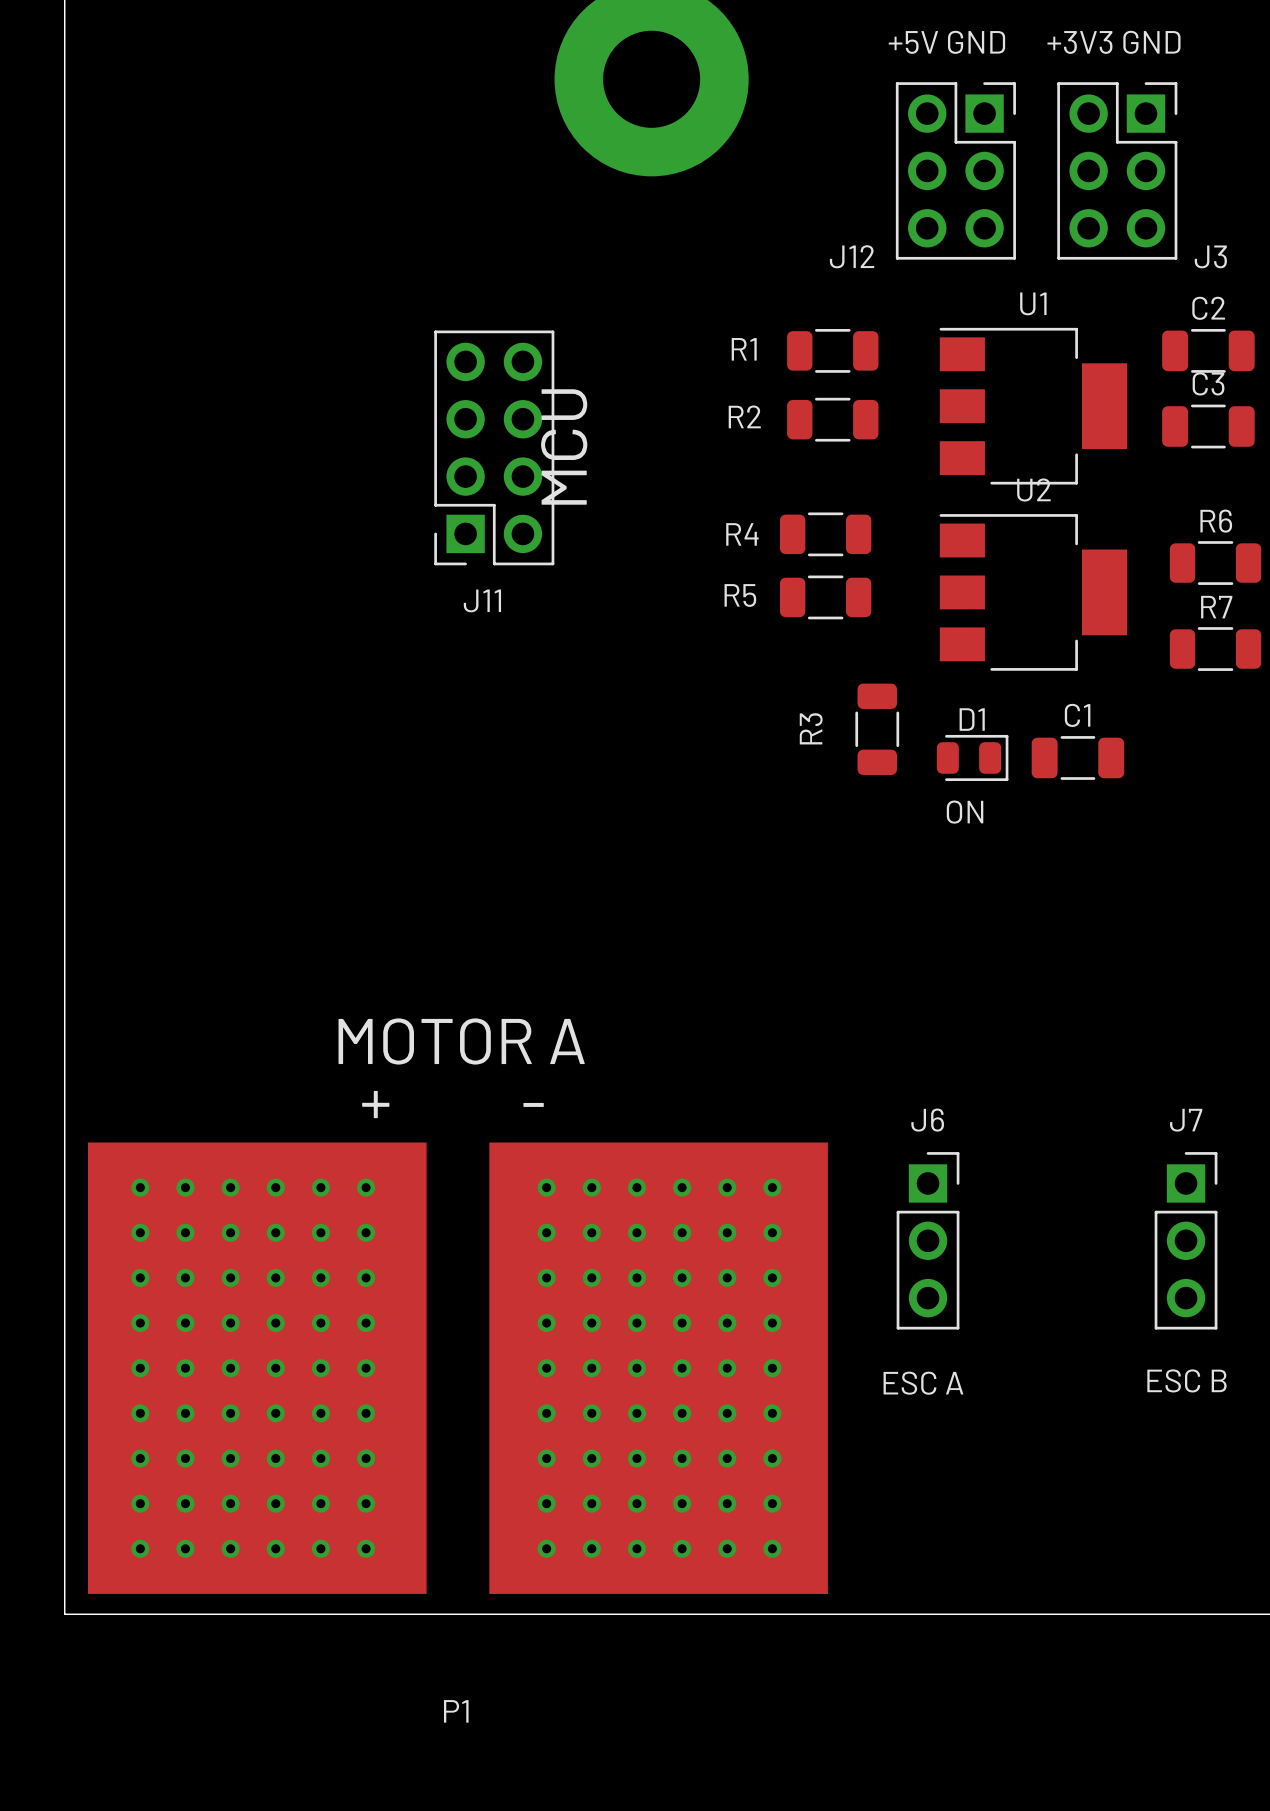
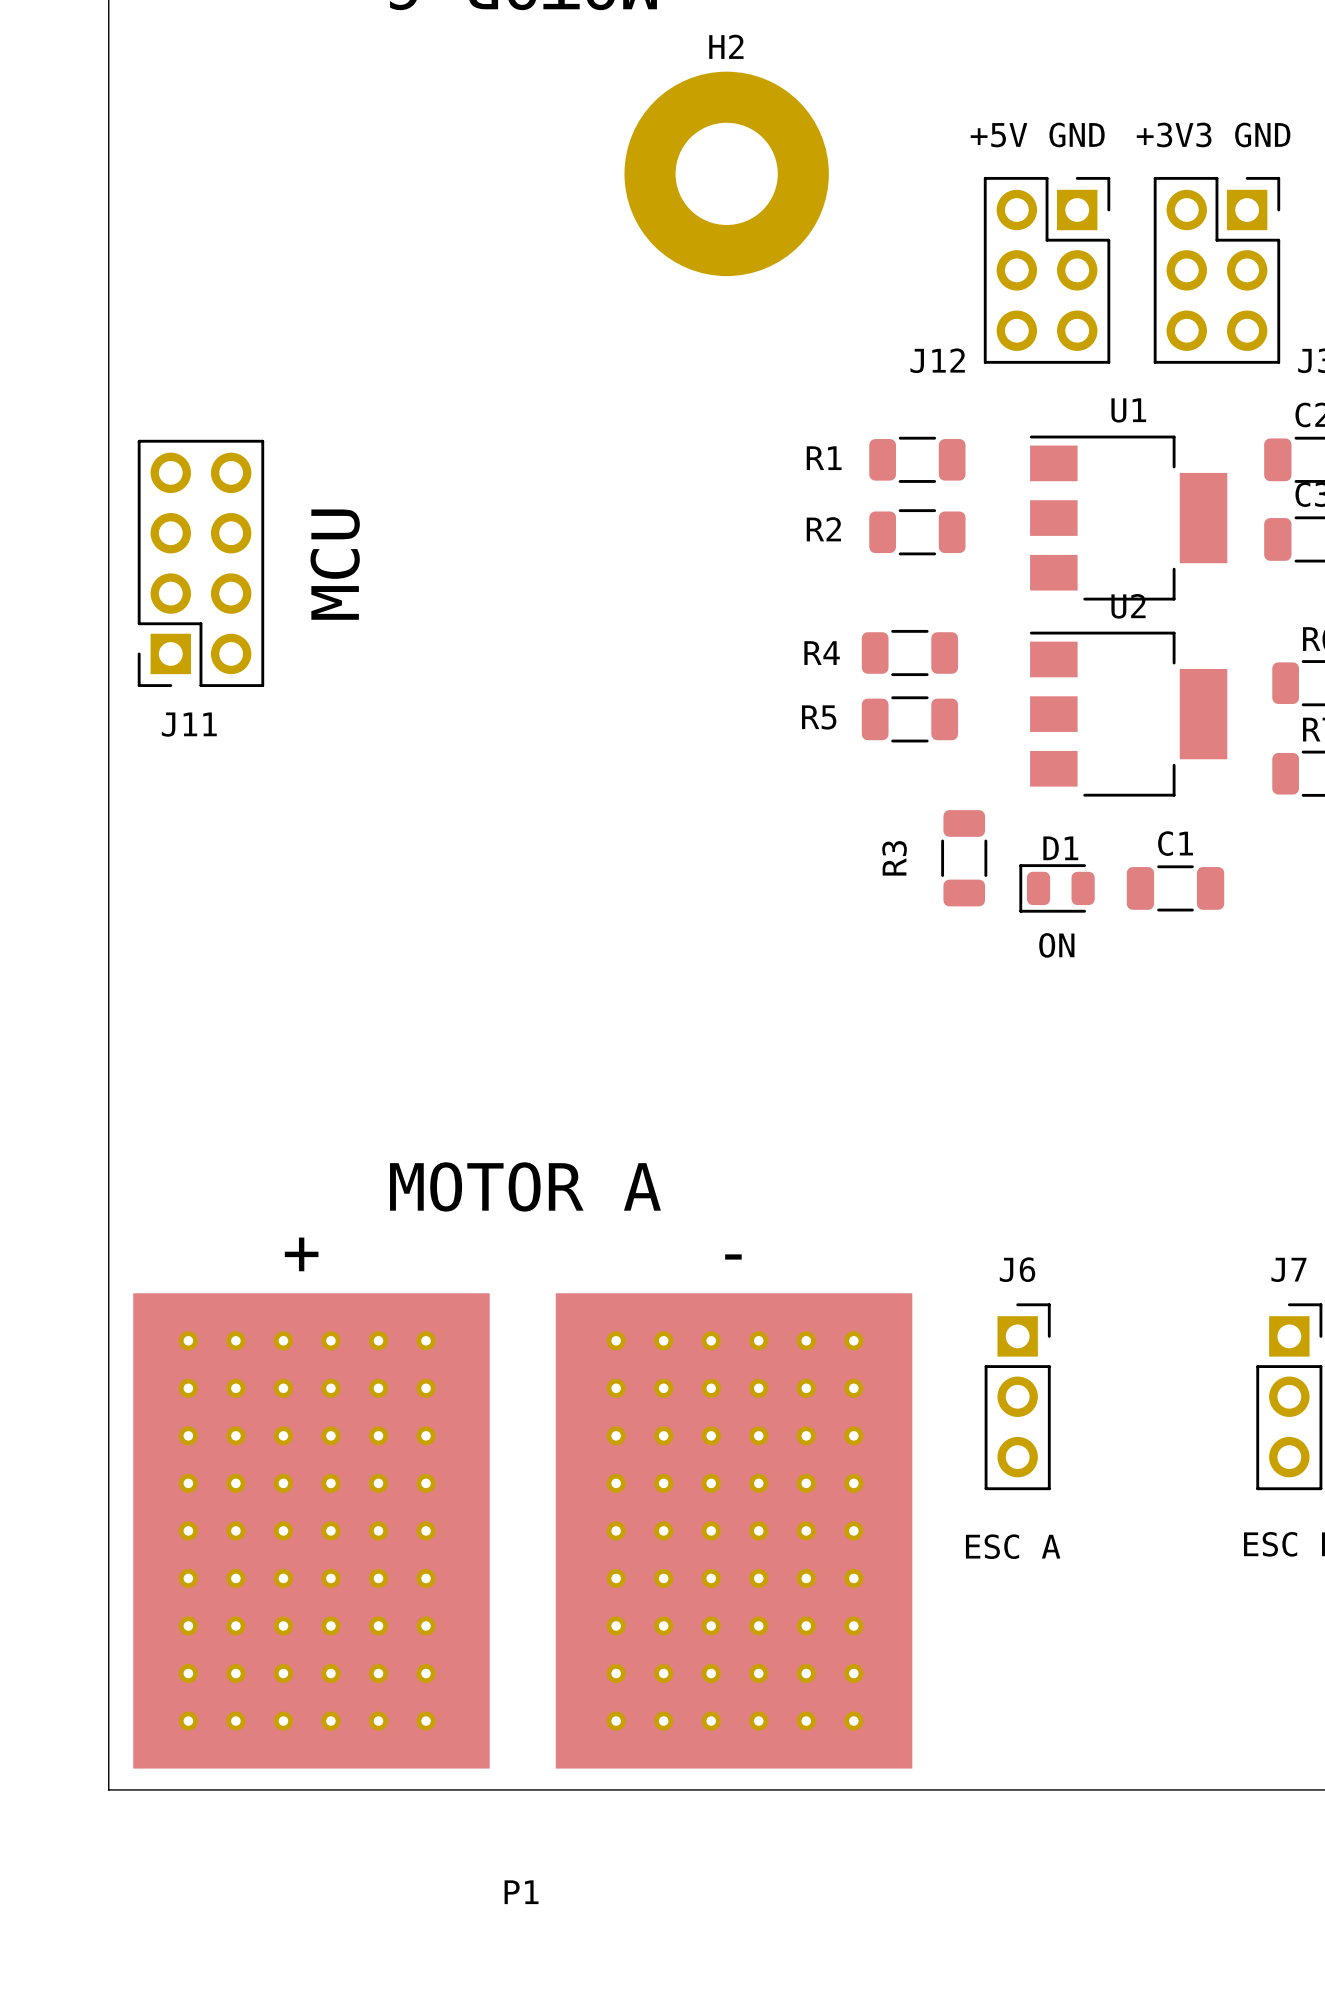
text position: MCU (564, 446) -> MCU (335, 564)
J11 position: (494, 447) -> (200, 563)
D1 rotation: 0° (972, 757) -> 180° (1057, 888)

